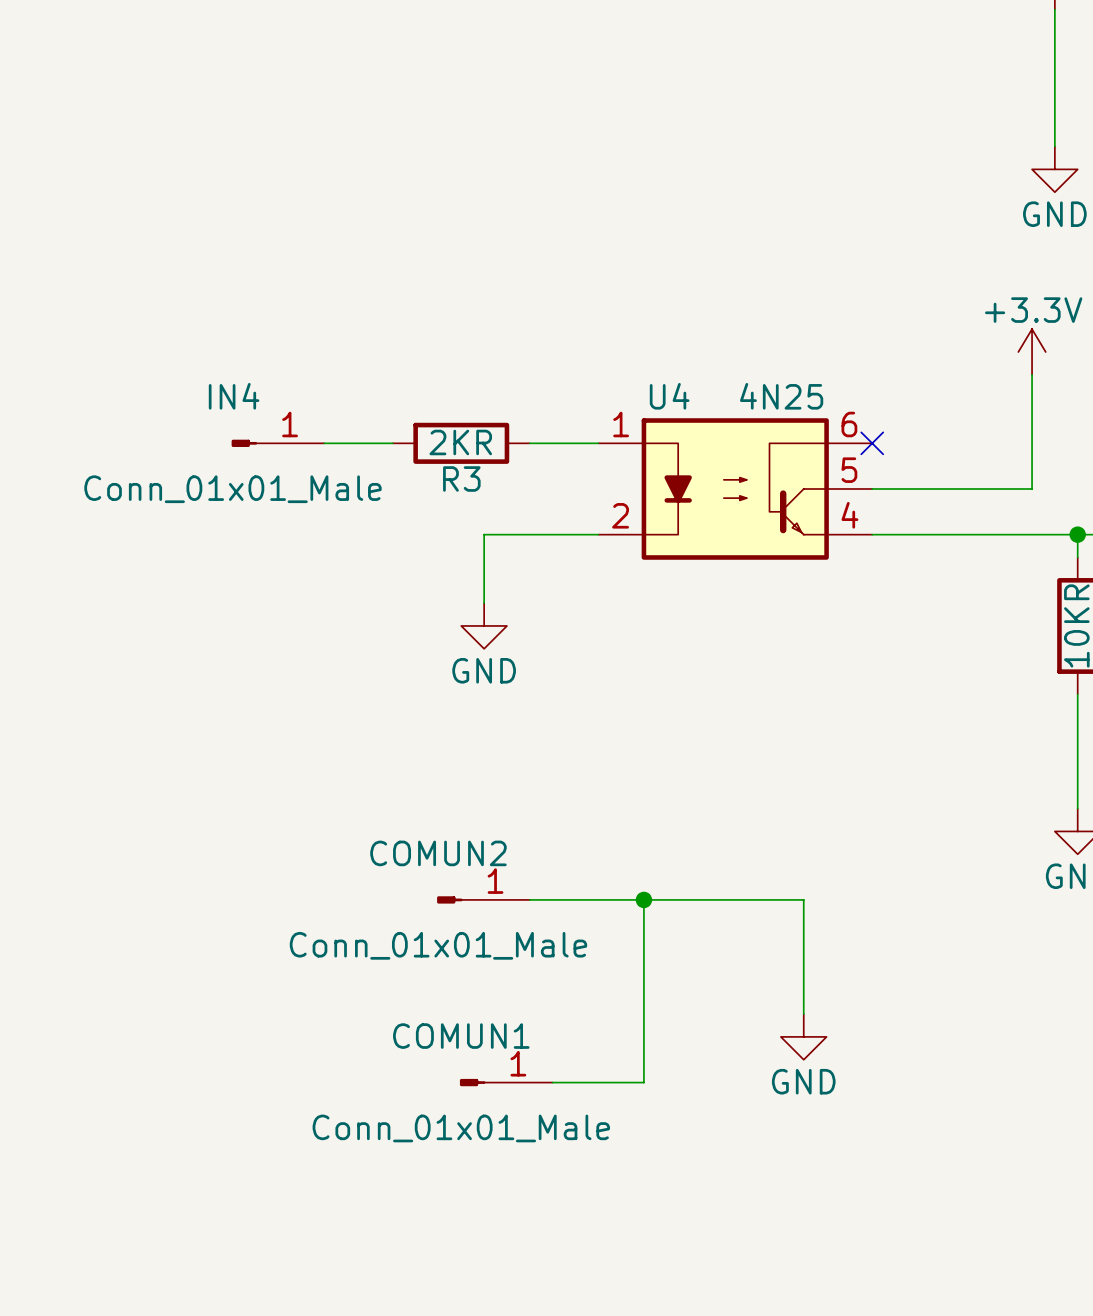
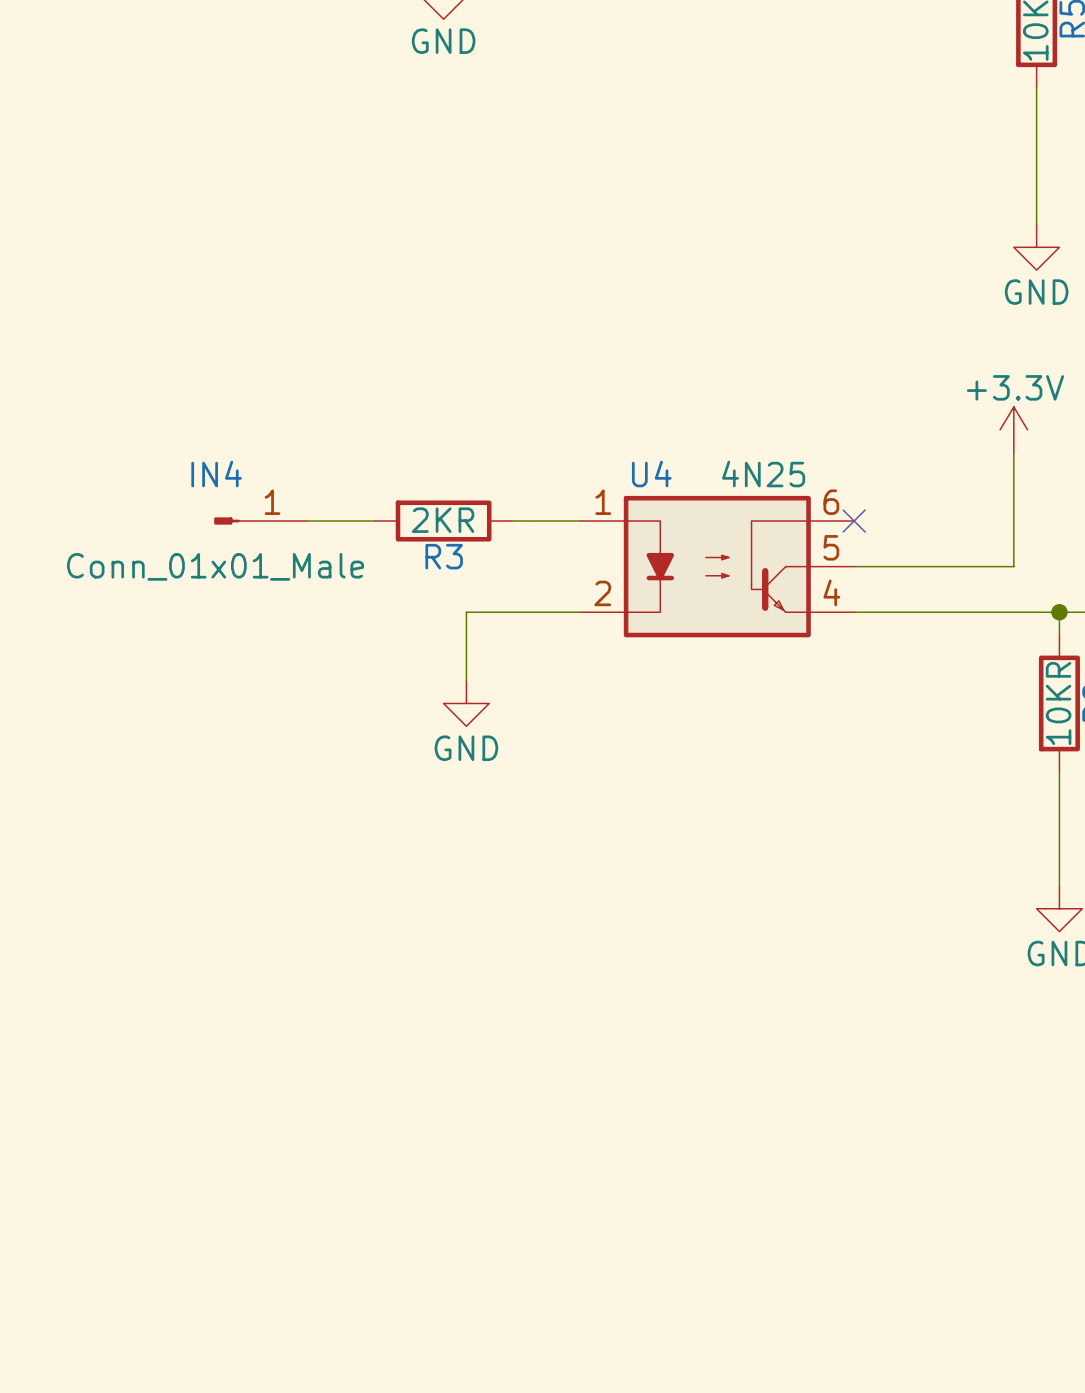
COMUN2: Conn_01x01_Male (483, 899) -> none
wire: (529, 899) (803, 899) (803, 1014) -> none
wire: (643, 899) (643, 1082) (552, 1082) -> none
junction: (643, 899) -> none
power symbol: GND (803, 1036) -> none
COMUN1: Conn_01x01_Male (506, 1082) -> none

